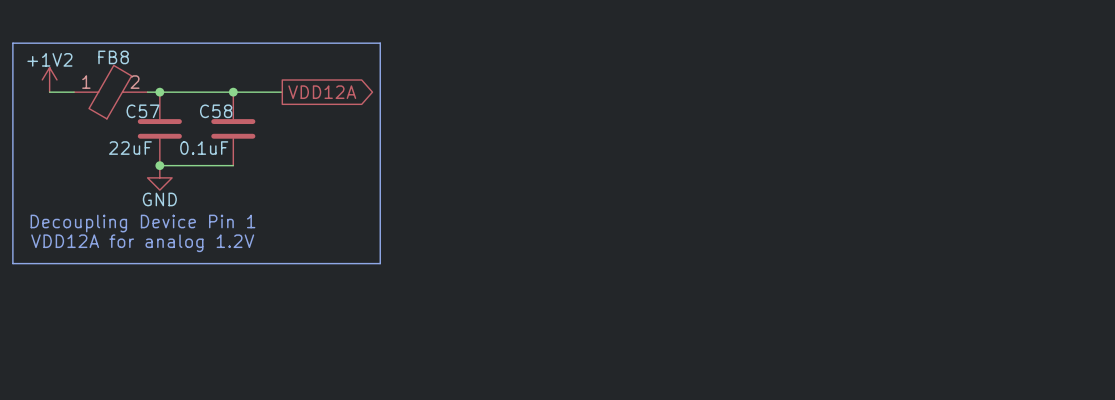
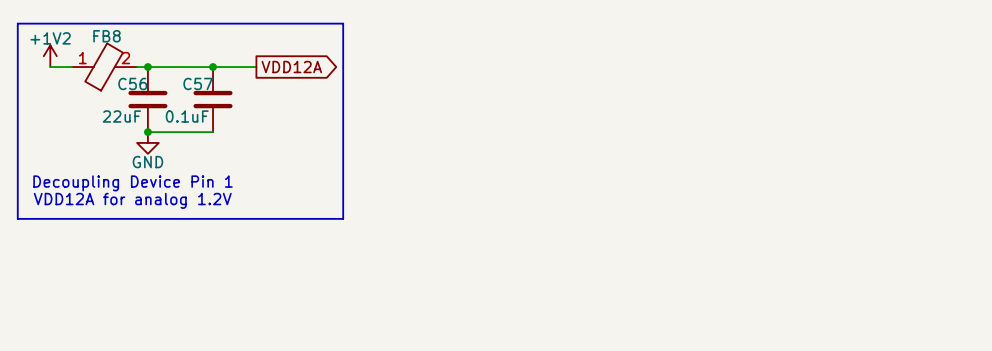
C57 name: C57 (142, 111) -> C56 (132, 83)
C58 name: C58 (216, 111) -> C57 (198, 83)

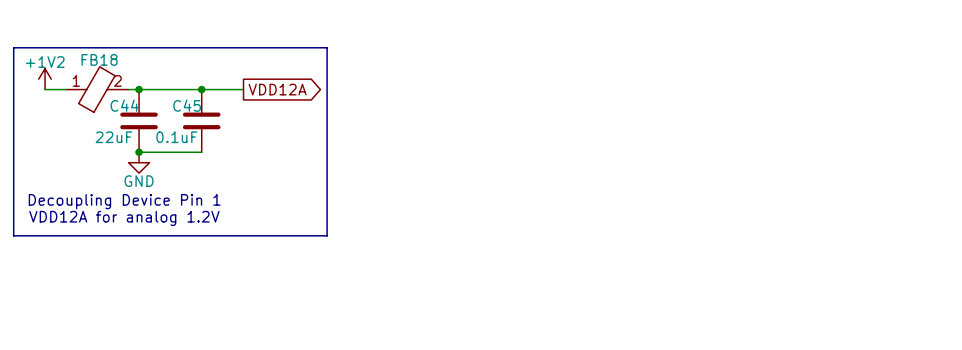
FB8 name: FB8 (106, 36) -> FB18 (99, 59)
C56 name: C56 (132, 83) -> C44 (124, 105)
C57 name: C57 (198, 83) -> C45 (187, 105)

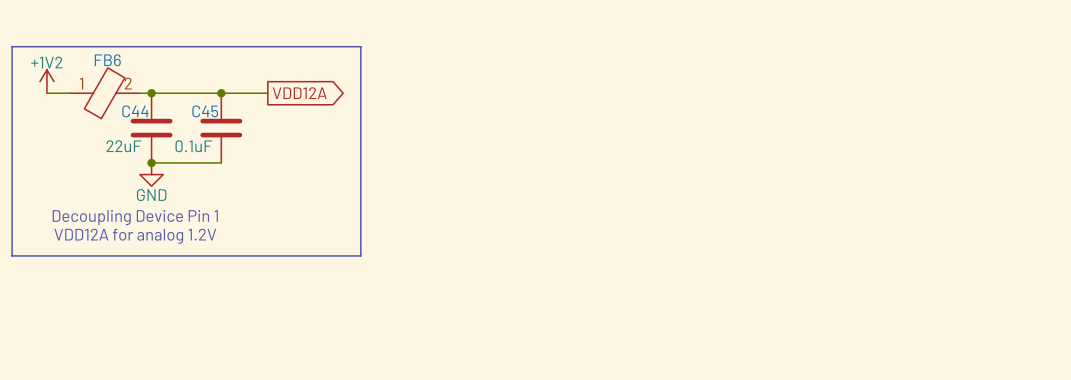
FB18 name: FB18 (99, 59) -> FB6 (107, 60)

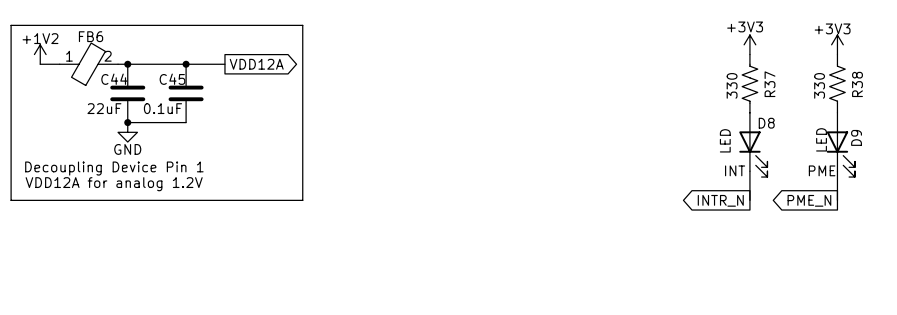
power symbol: none -> +3V3 (749, 44)
power symbol: none -> +3V3 (837, 44)
R37: none -> 330 (749, 83)
R38: none -> 330 (837, 83)
D8: none -> LED (753, 144)
D9: none -> LED (840, 144)
text: none -> INT (735, 170)
text: none -> PME (822, 170)
wire: none -> (749, 171) (749, 200)
wire: none -> (837, 171) (837, 200)
global label: none -> INTR_N (720, 200)
global label: none -> PME_N (809, 200)

